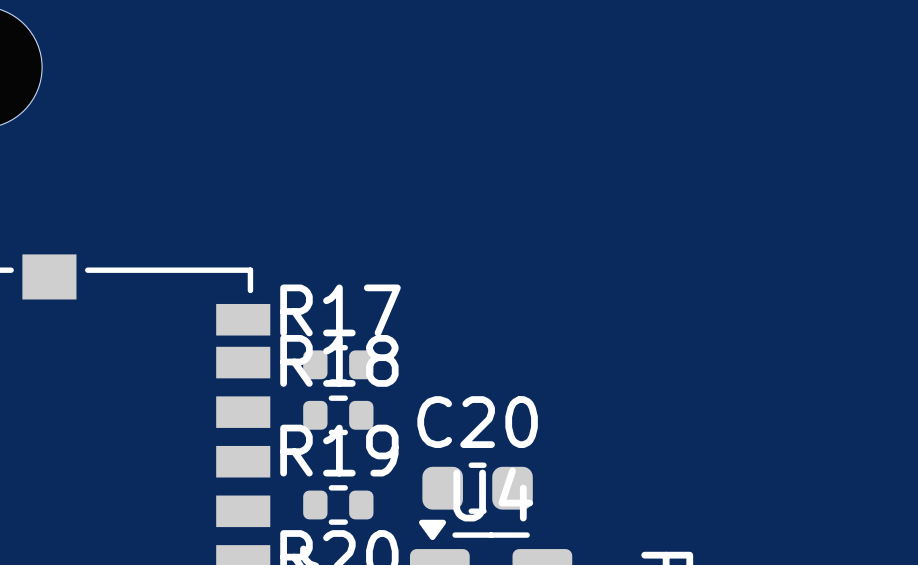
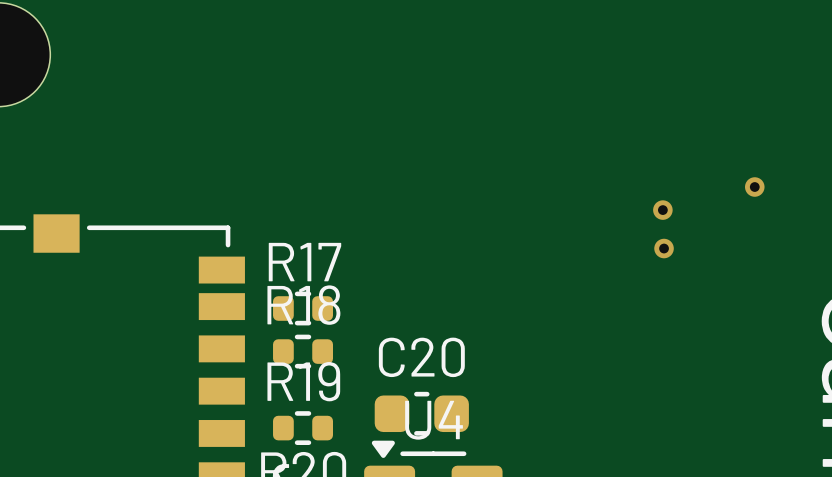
via: none -> (754, 187)
via: none -> (662, 210)
via: none -> (664, 248)

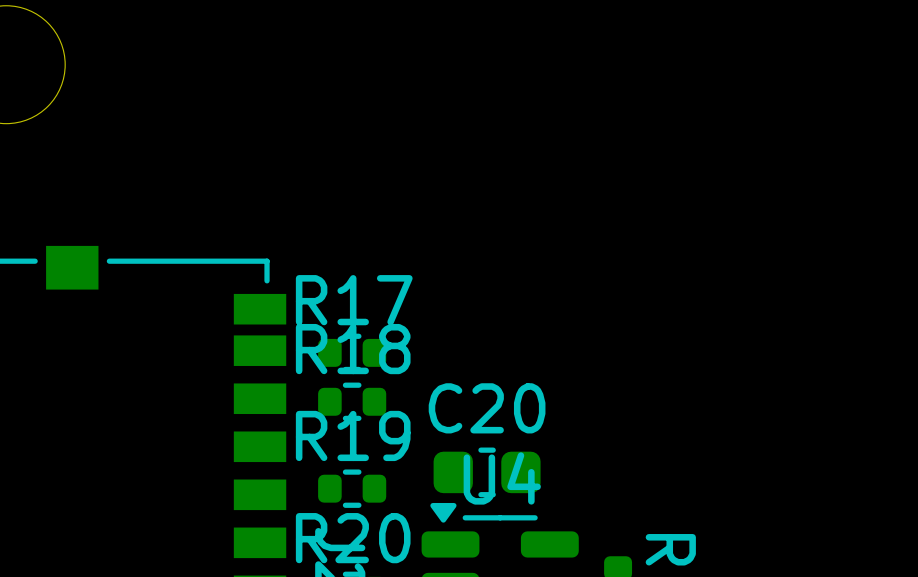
via: (754, 187) -> none
via: (662, 210) -> none
via: (664, 248) -> none

